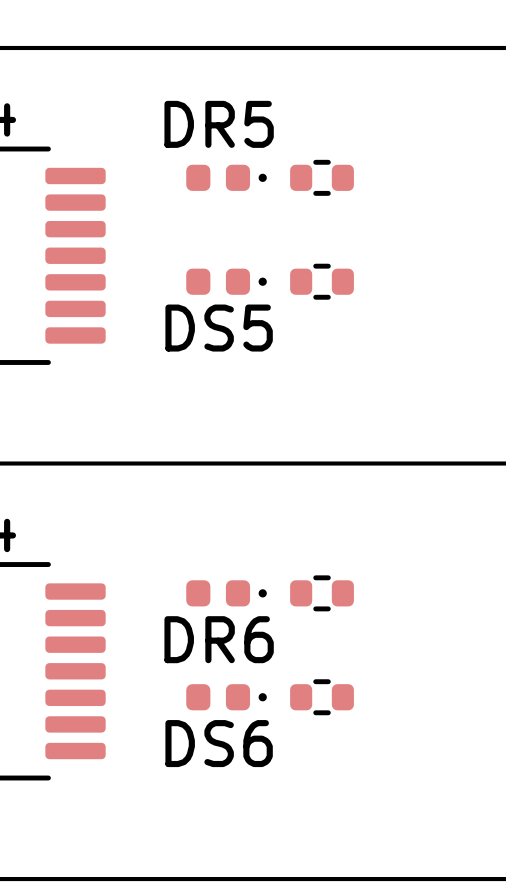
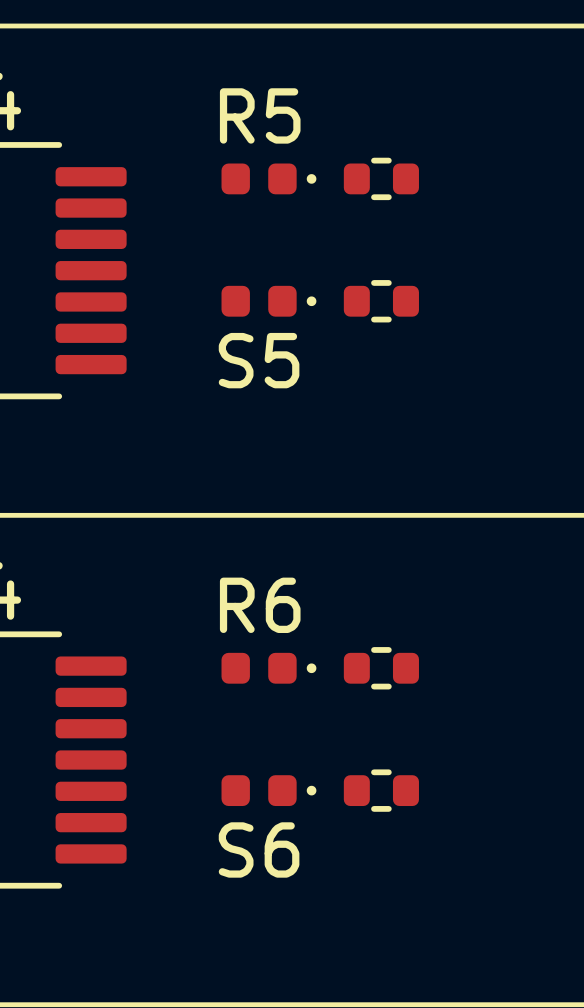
DR5 text: none -> R5 (260, 115)
DR5 name: DR5 (219, 124) -> none
DS5 name: DS5 (219, 328) -> none
DS5 text: none -> S5 (259, 360)
DR6 text: none -> R6 (260, 605)
DR6 name: DR6 (219, 639) -> none
DS6 name: DS6 (219, 743) -> none
DS6 text: none -> S6 (259, 849)

